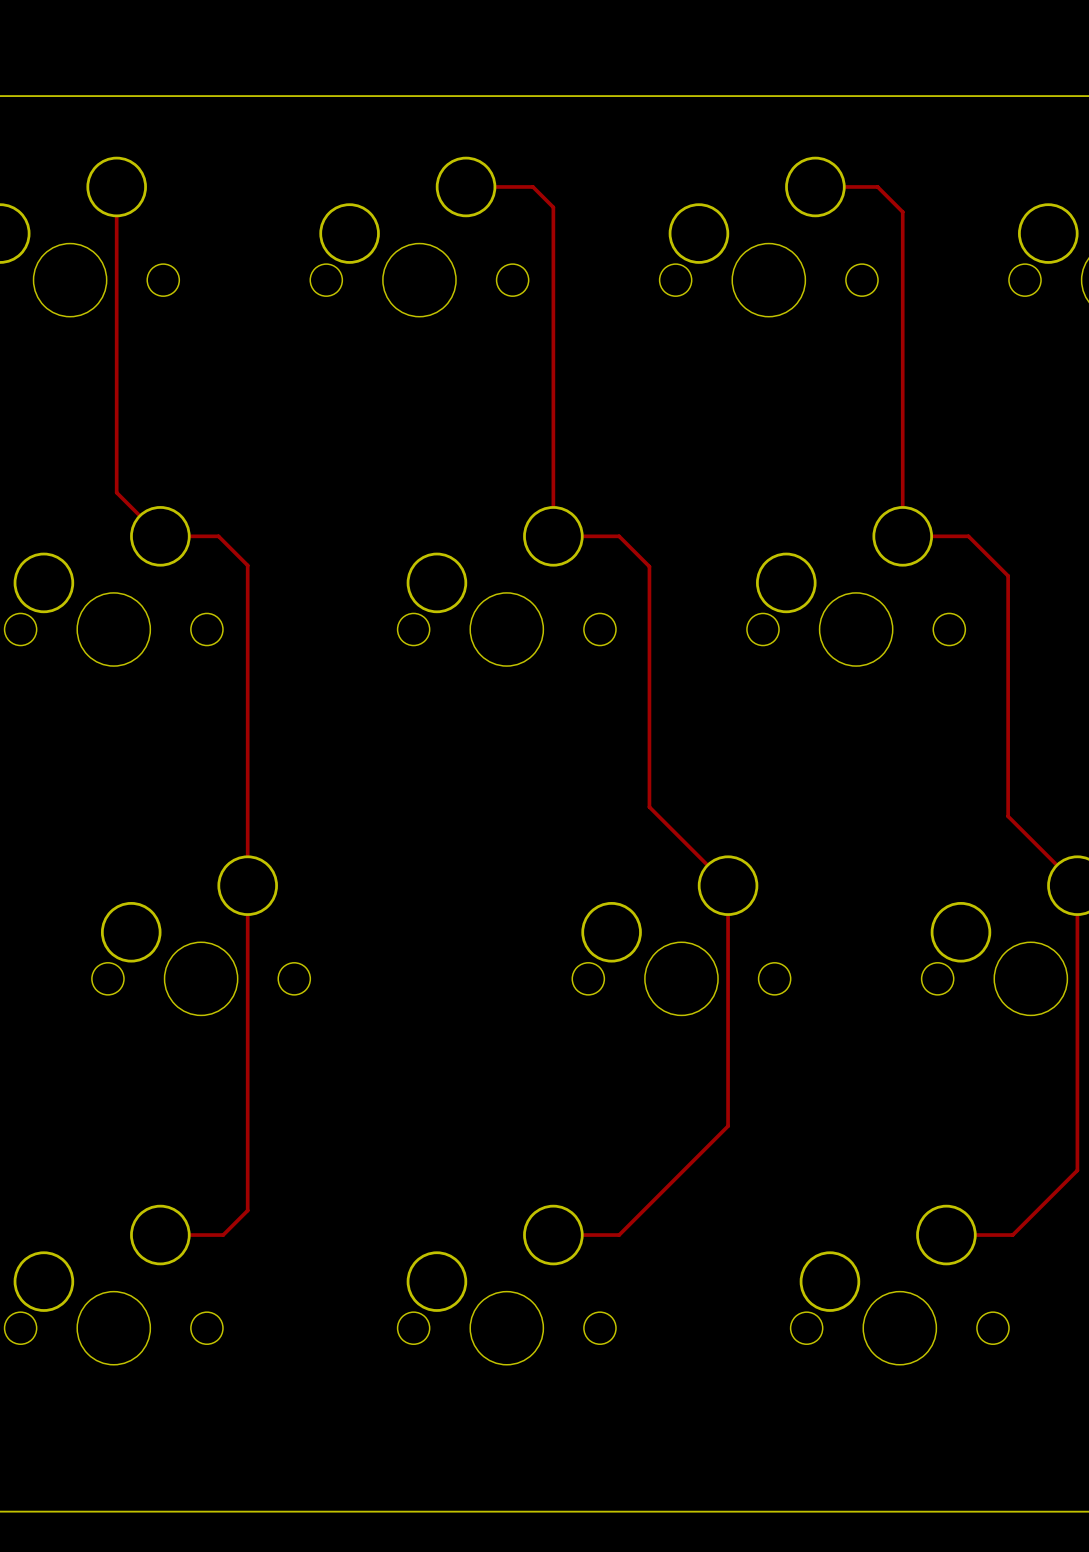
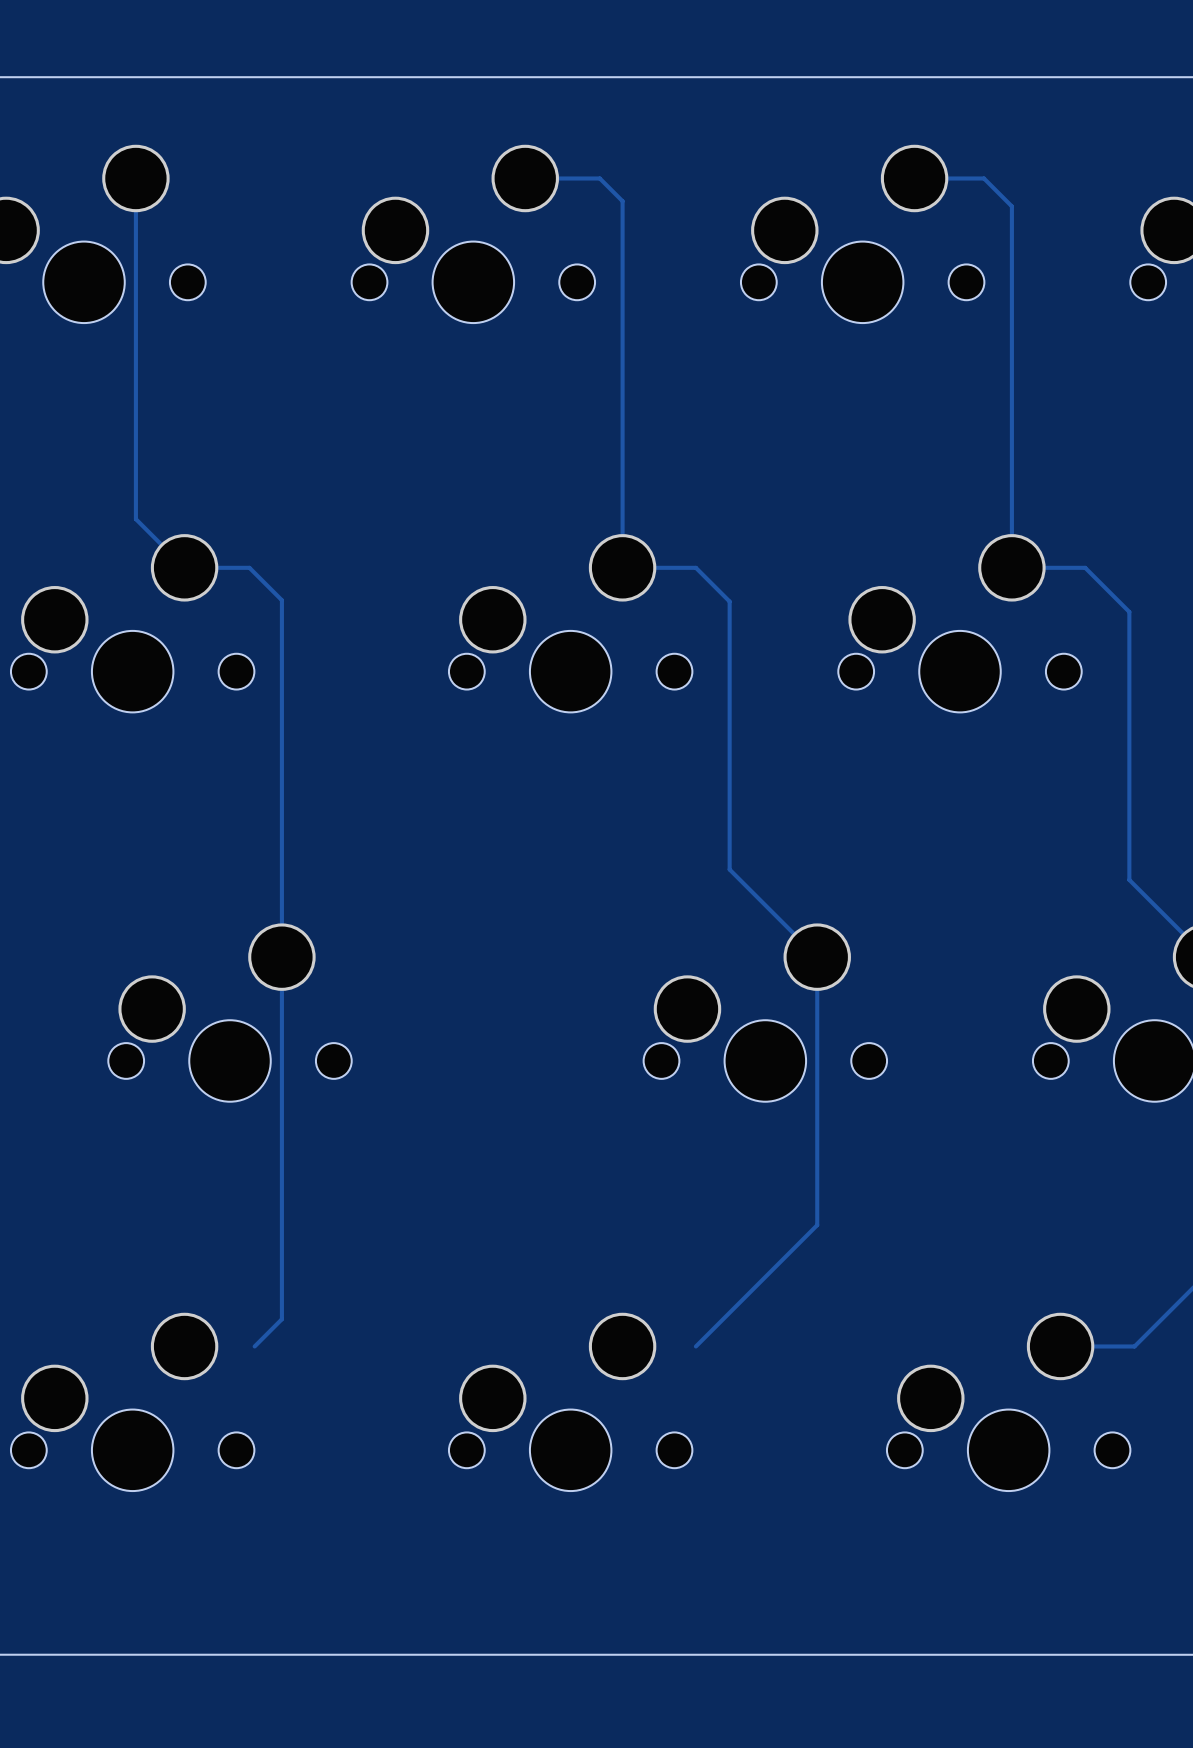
track: (160, 1235) (223, 1235) -> none
track: (553, 1235) (619, 1235) -> none

